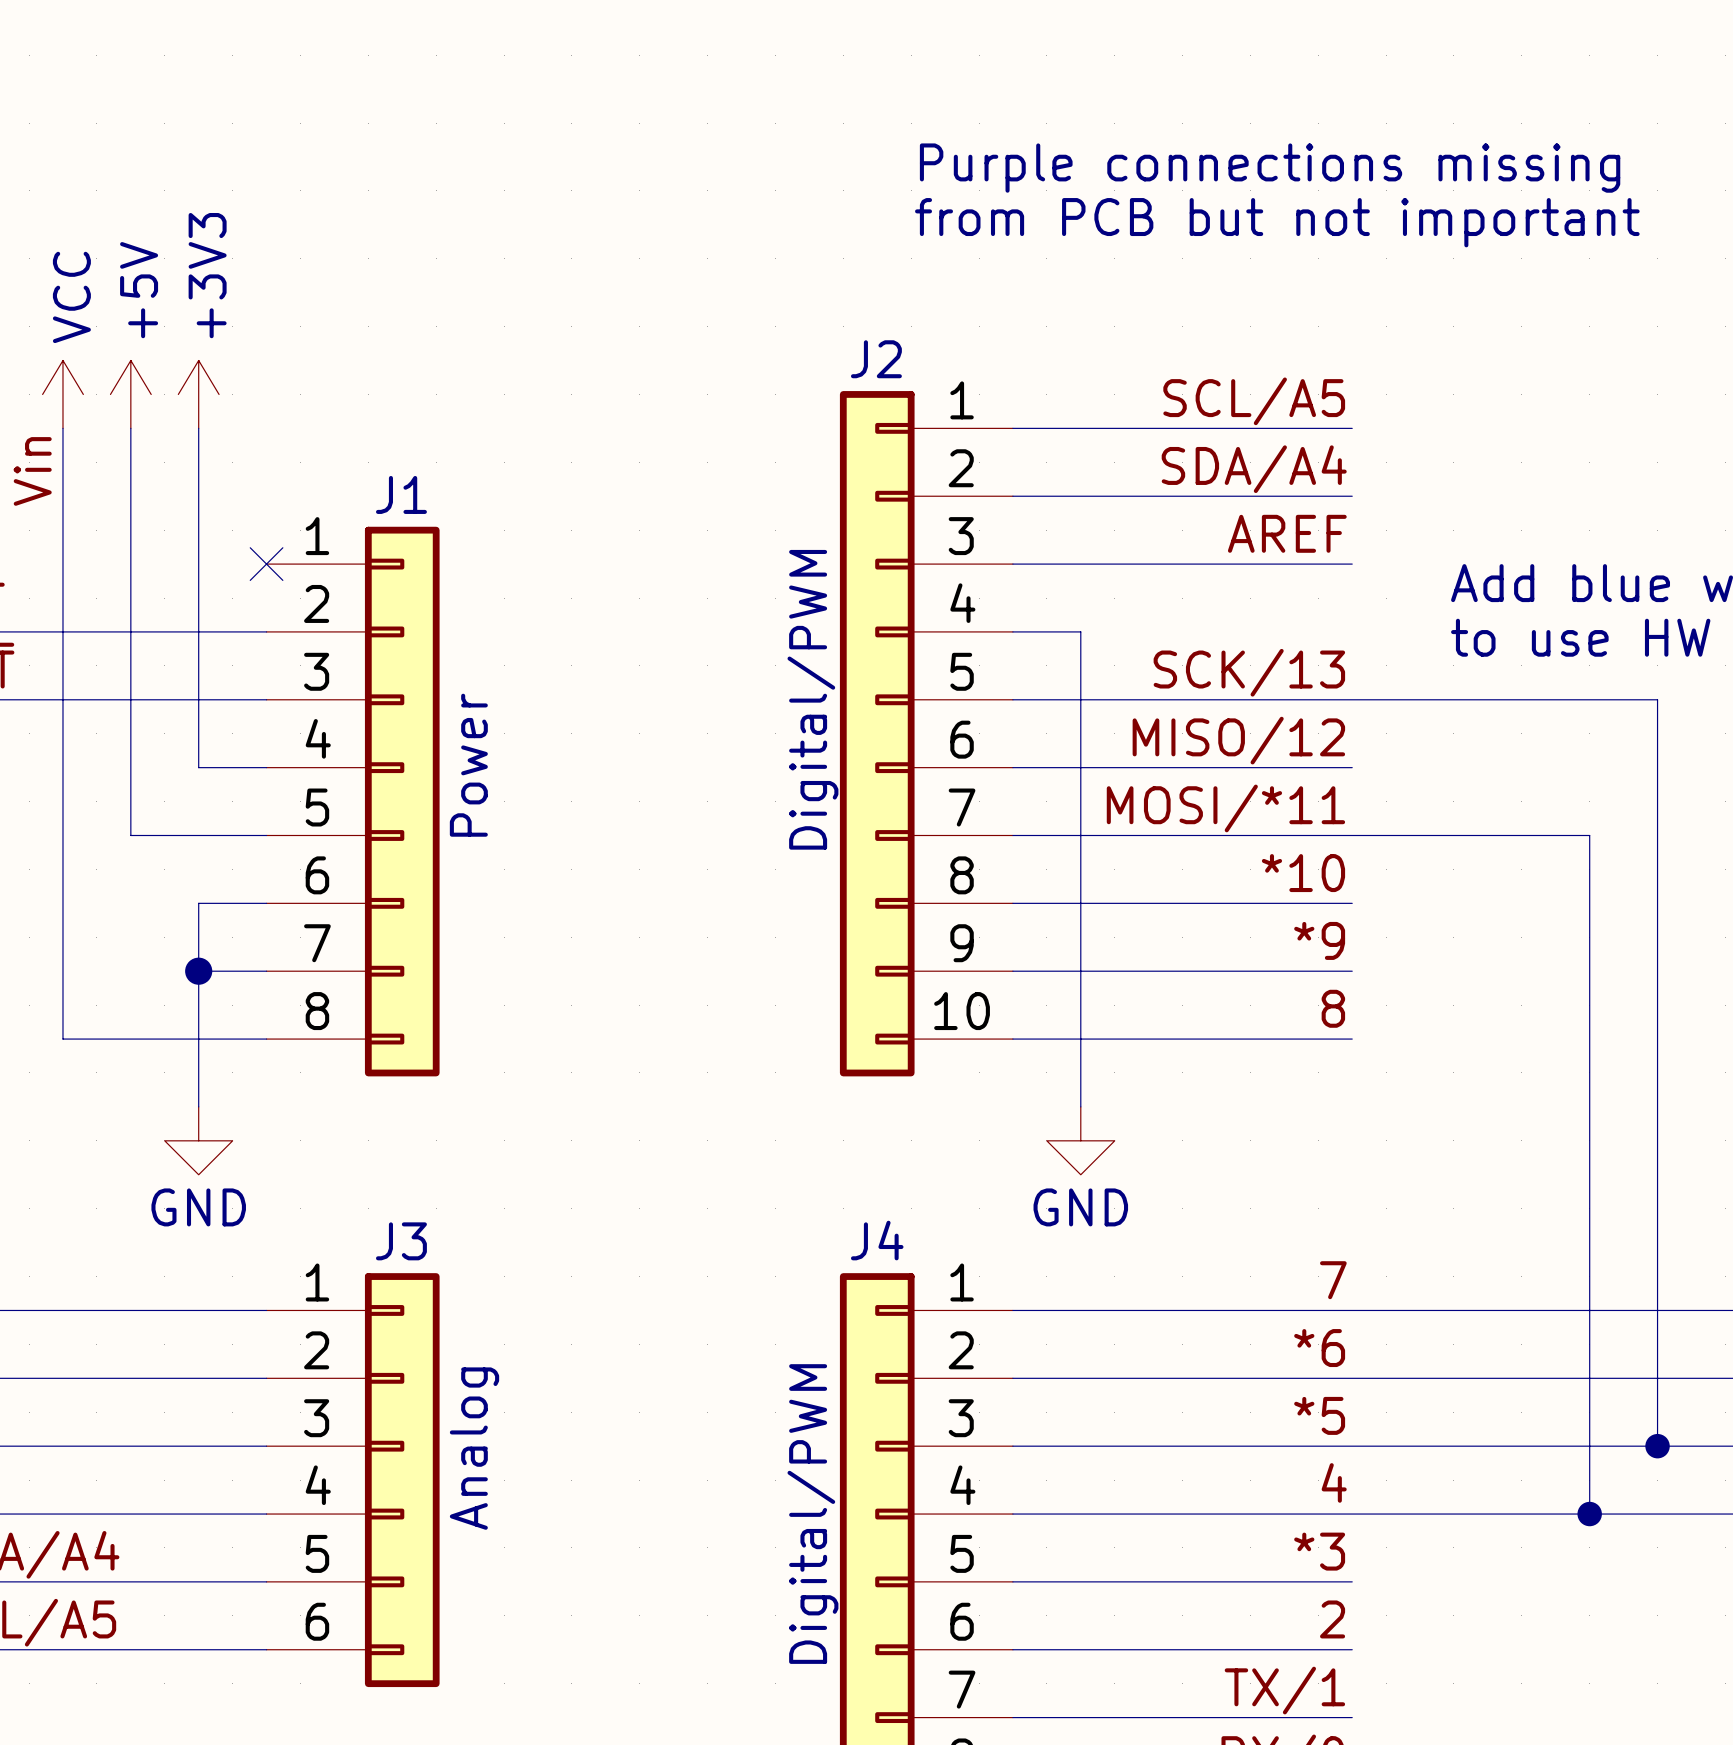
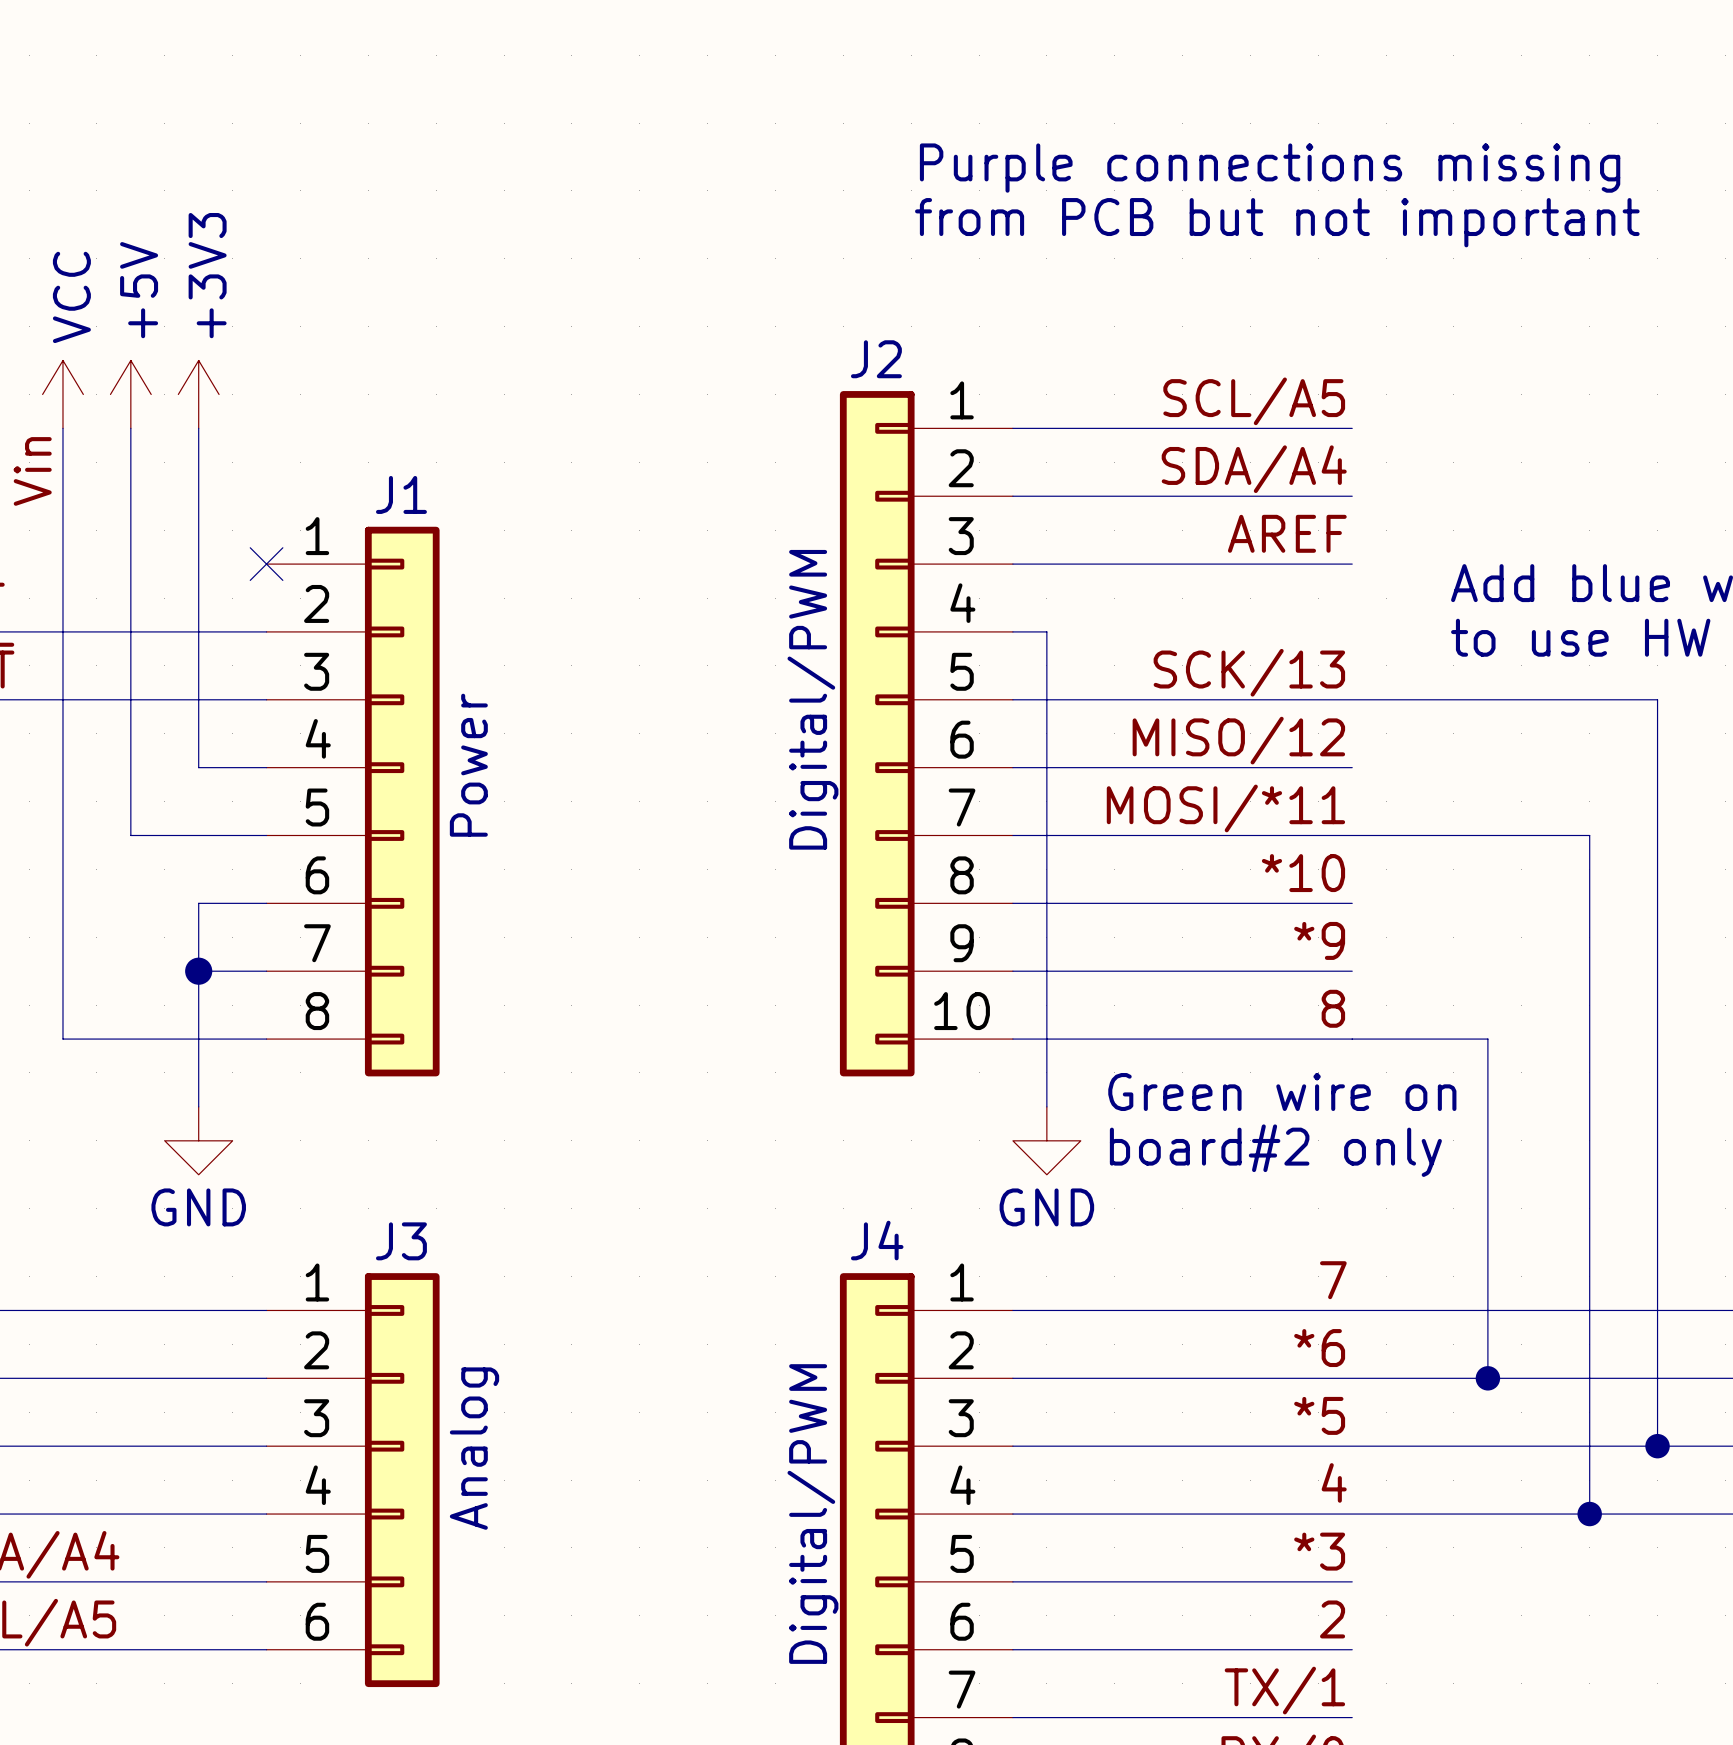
wire: (1046, 631) (1080, 631) (1080, 1106) -> (1046, 631) (1046, 1106)
wire: none -> (1352, 1039) (1487, 1039) (1487, 1378)
text: none -> Green wire on (1282, 1092)
power symbol position: GND (1080, 1140) -> GND (1046, 1140)
text: none -> board#2 only (1275, 1150)
junction: none -> (1487, 1378)

